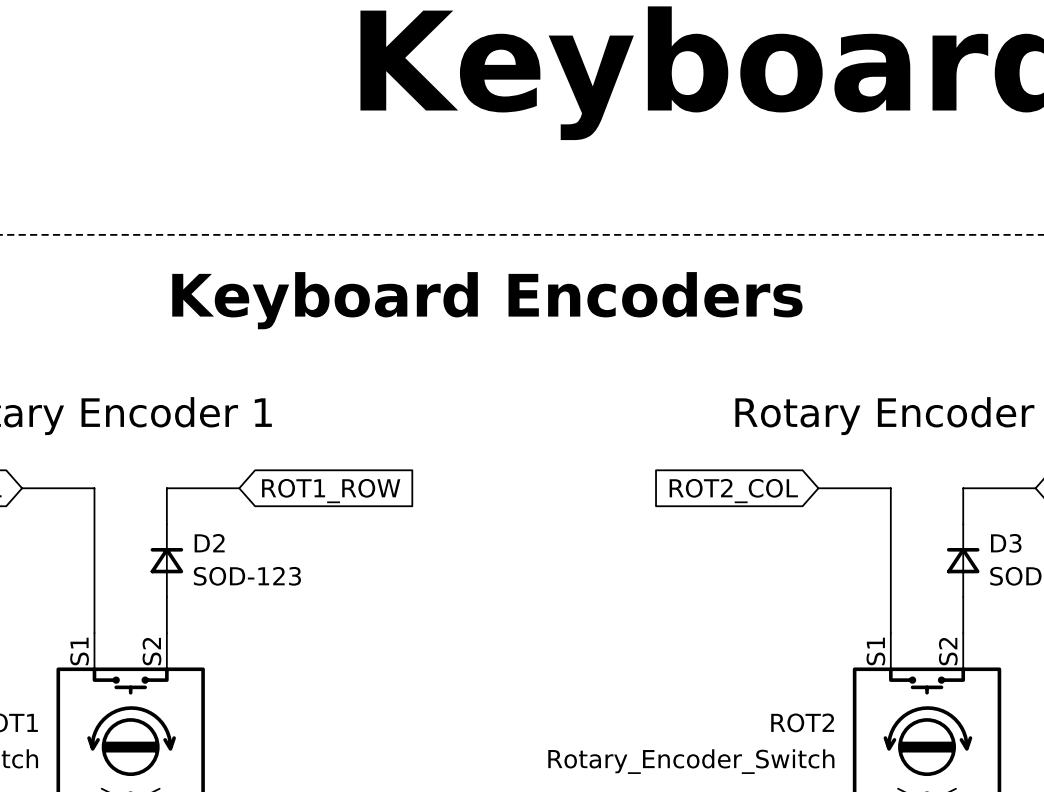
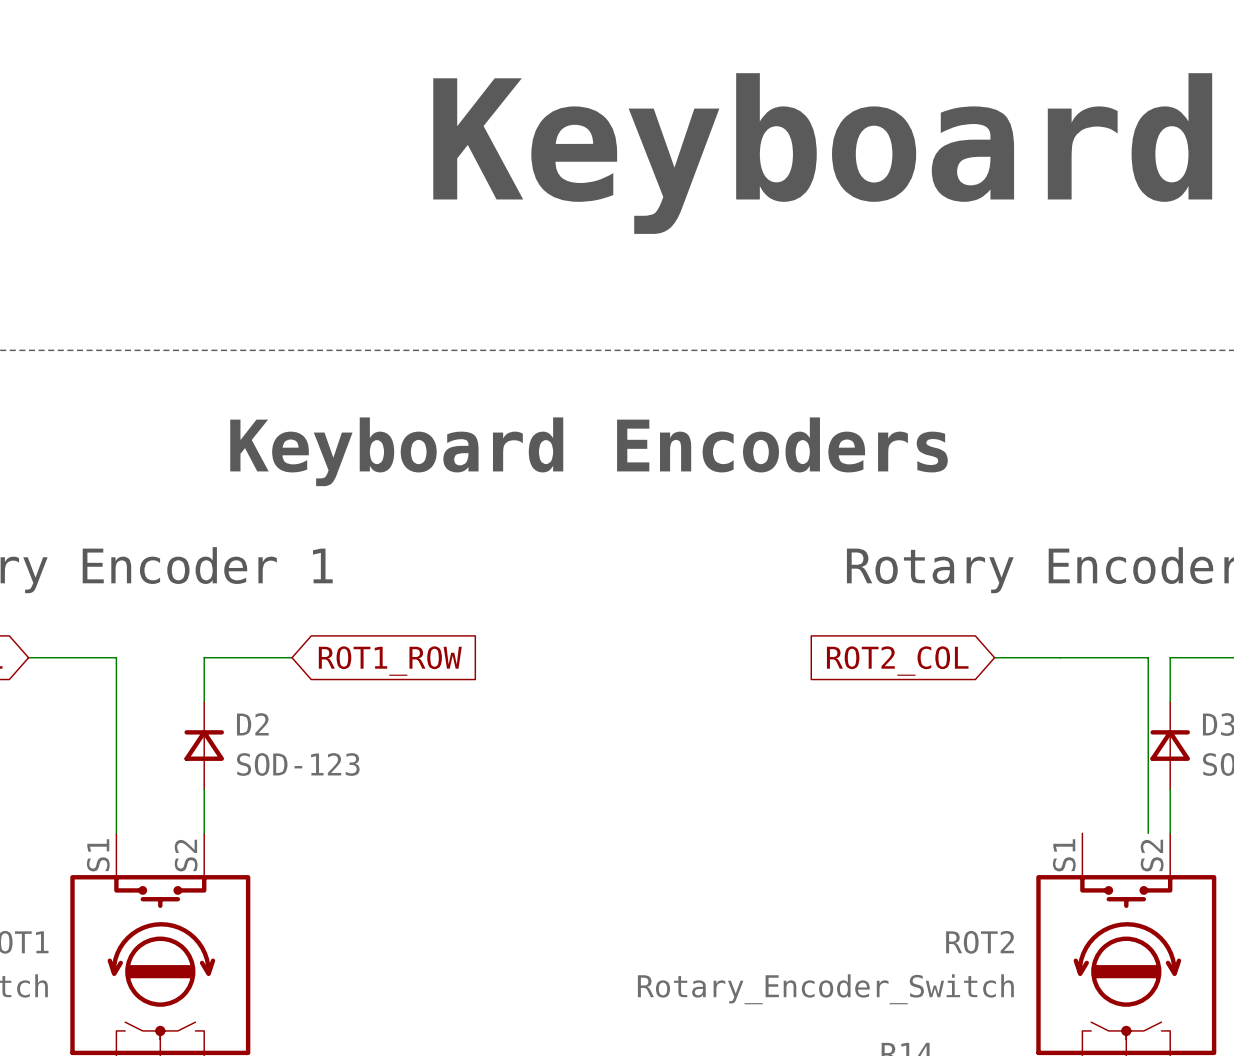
text position: Keyboard Encoders (487, 300) -> Keyboard Encoders (589, 451)
wire: (890, 488) (890, 633) -> (1082, 657) (1148, 657) (1148, 833)

